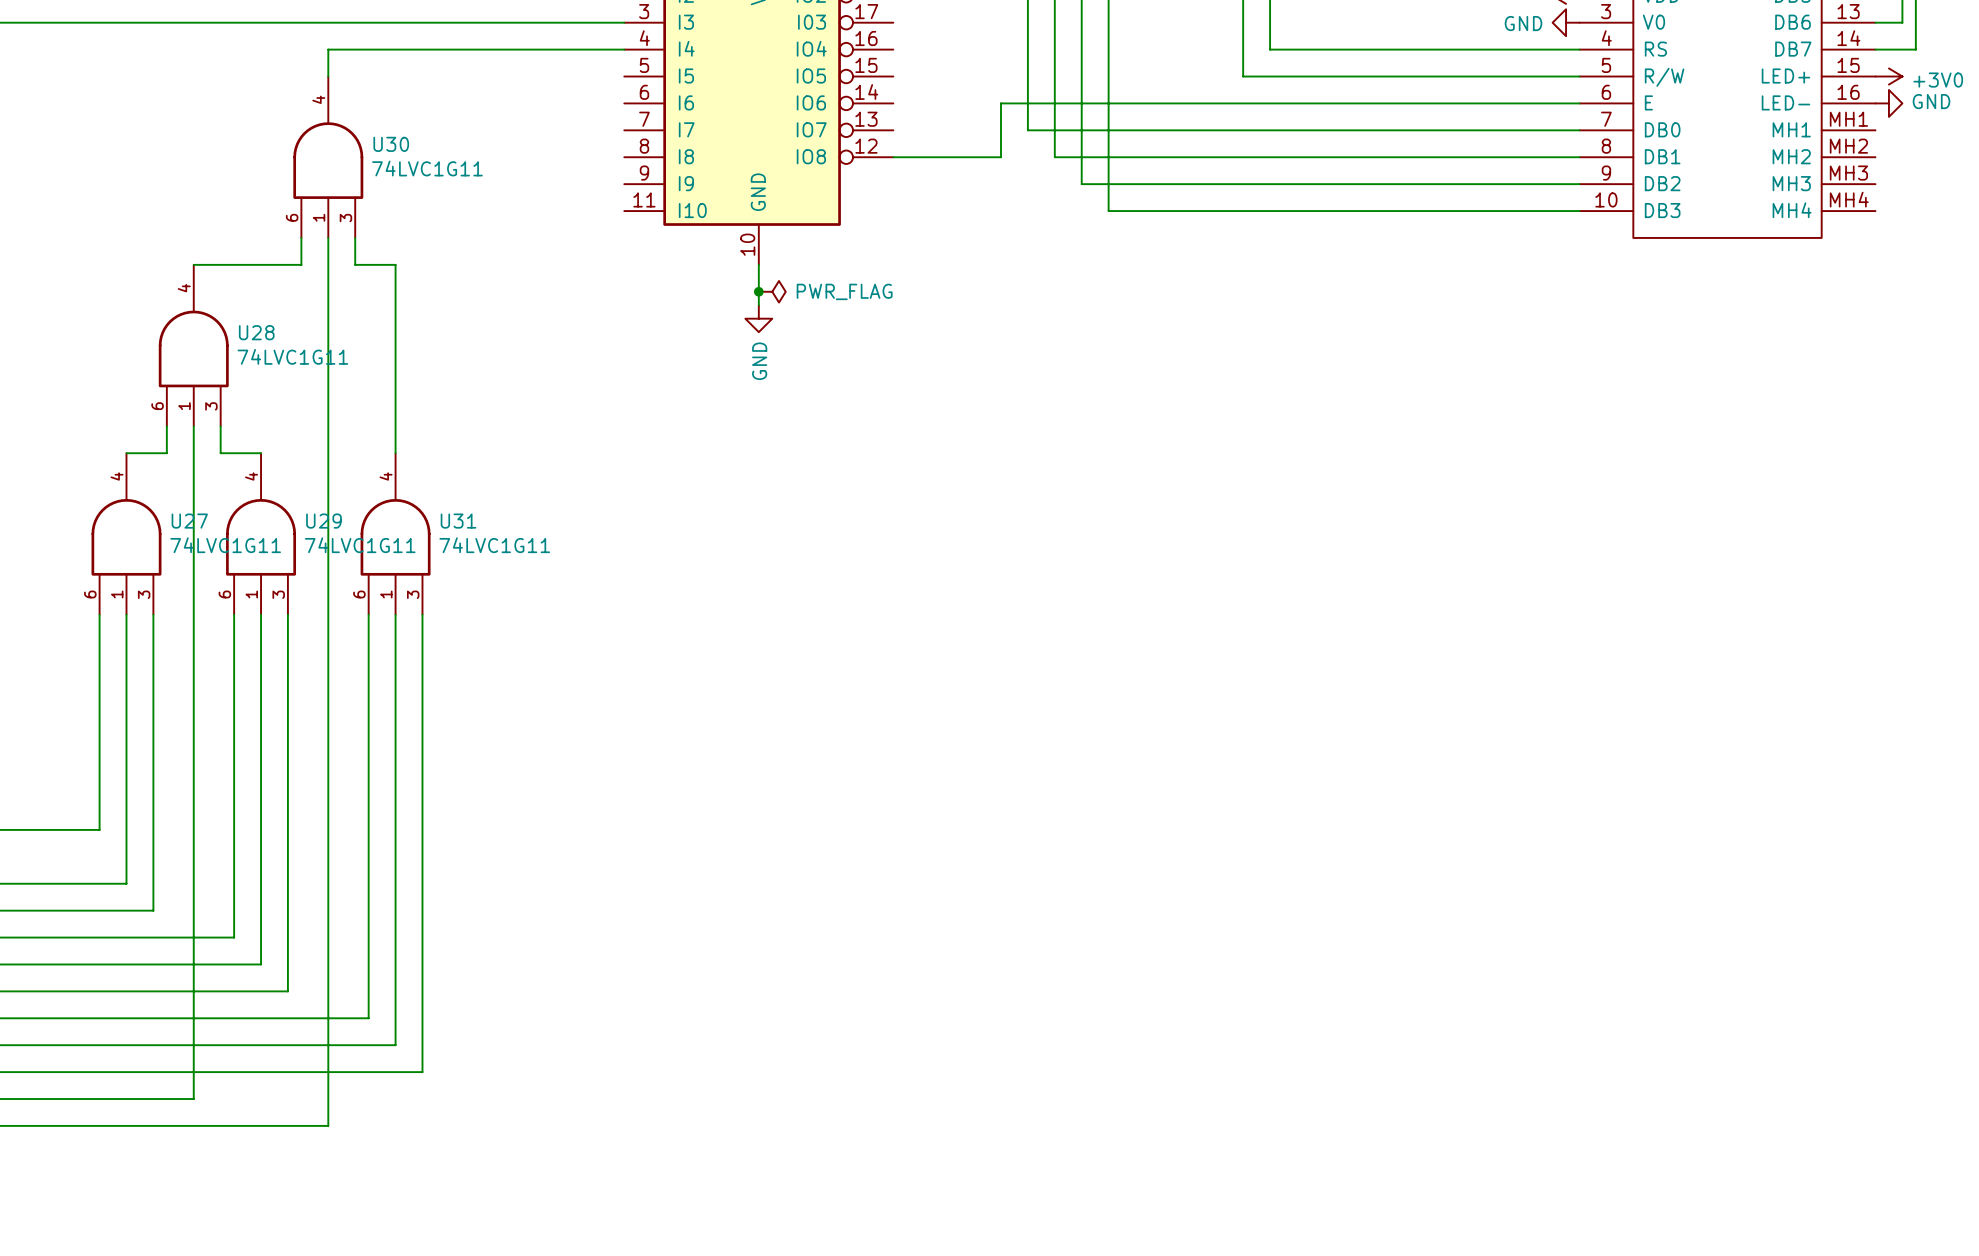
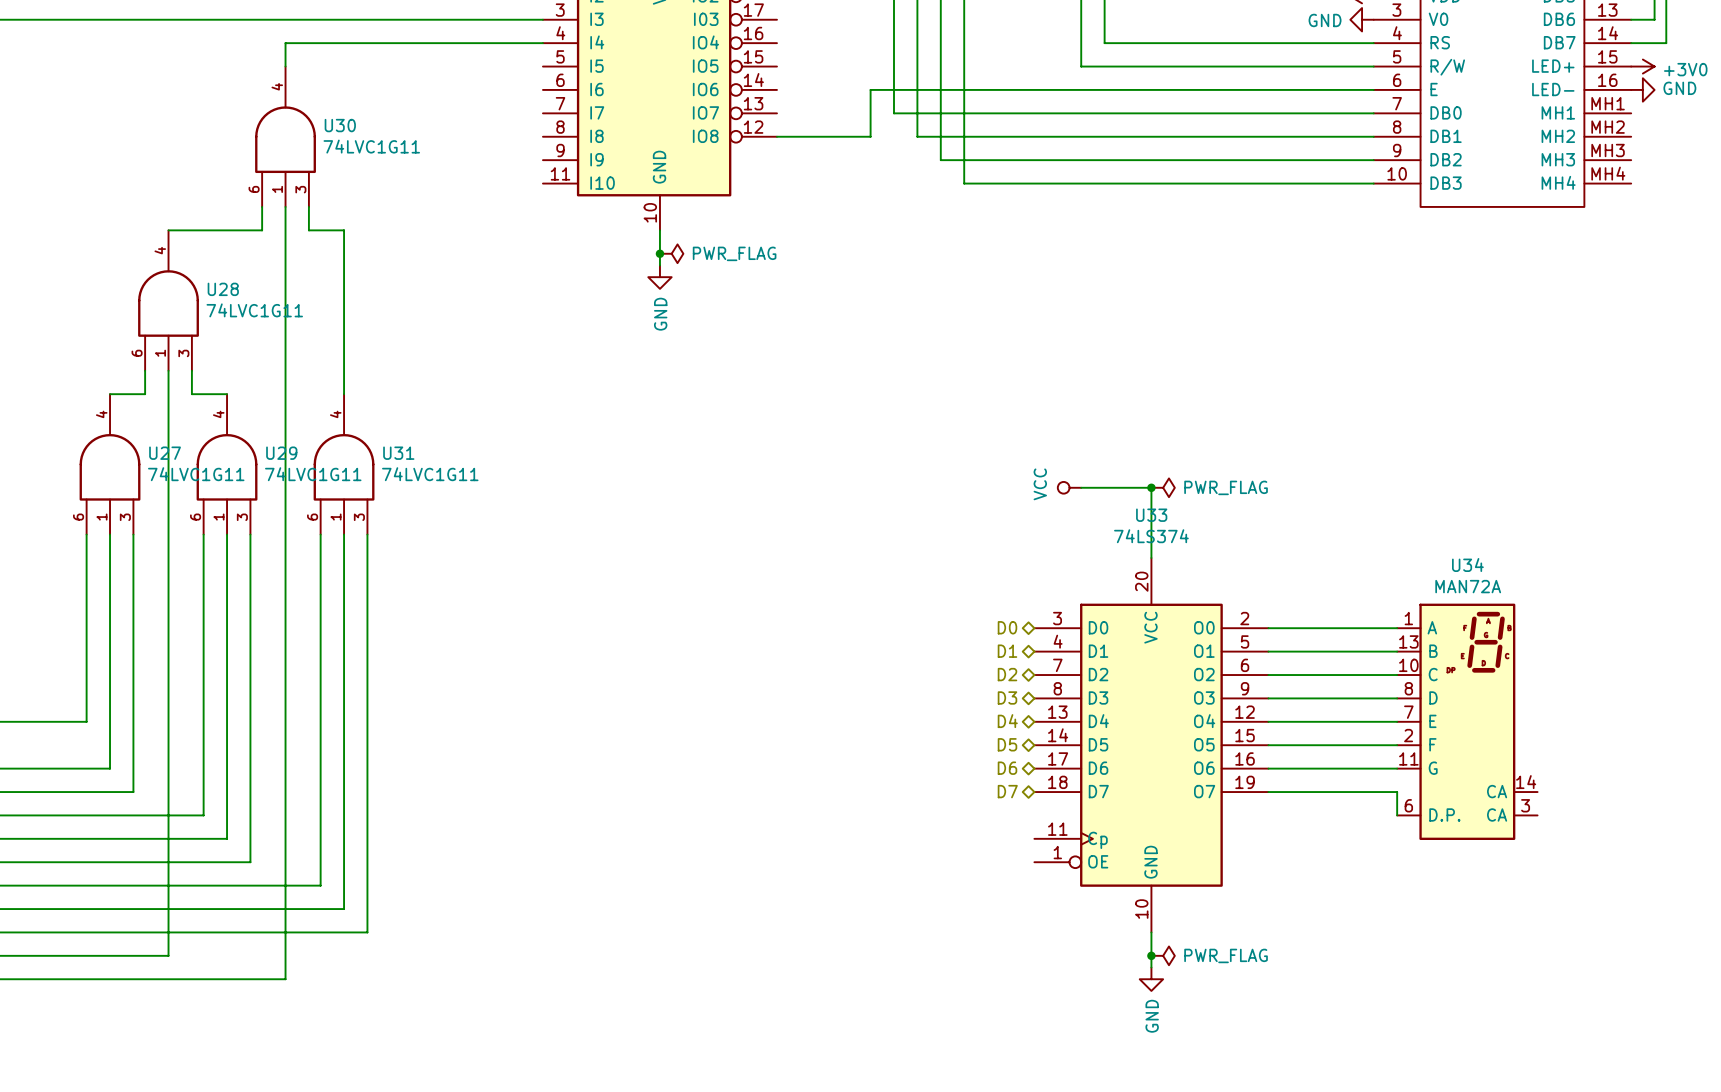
power symbol: none -> VCC (1069, 487)
wire: none -> (1081, 487) (1151, 487) (1151, 558)
junction: none -> (1151, 487)
power symbol: none -> PWR_FLAG (1163, 487)
hierarchical label: none -> D0 (1007, 627)
wire: none -> (1268, 628) (1397, 628)
hierarchical label: none -> D1 (1007, 651)
wire: none -> (1268, 651) (1397, 651)
hierarchical label: none -> D2 (1007, 674)
wire: none -> (1268, 675) (1397, 675)
hierarchical label: none -> D3 (1007, 697)
wire: none -> (1268, 698) (1397, 698)
hierarchical label: none -> D4 (1007, 721)
wire: none -> (1268, 721) (1397, 721)
U34: none -> MAN72A (1467, 721)
hierarchical label: none -> D5 (1007, 744)
U33: none -> 74LS374 (1151, 745)
wire: none -> (1268, 745) (1397, 745)
hierarchical label: none -> D6 (1007, 768)
wire: none -> (1268, 768) (1397, 768)
hierarchical label: none -> D7 (1007, 791)
wire: none -> (1268, 792) (1397, 792) (1397, 815)
wire: none -> (1151, 932) (1151, 967)
junction: none -> (1151, 955)
power symbol: none -> PWR_FLAG (1163, 955)
power symbol: none -> GND (1151, 979)

